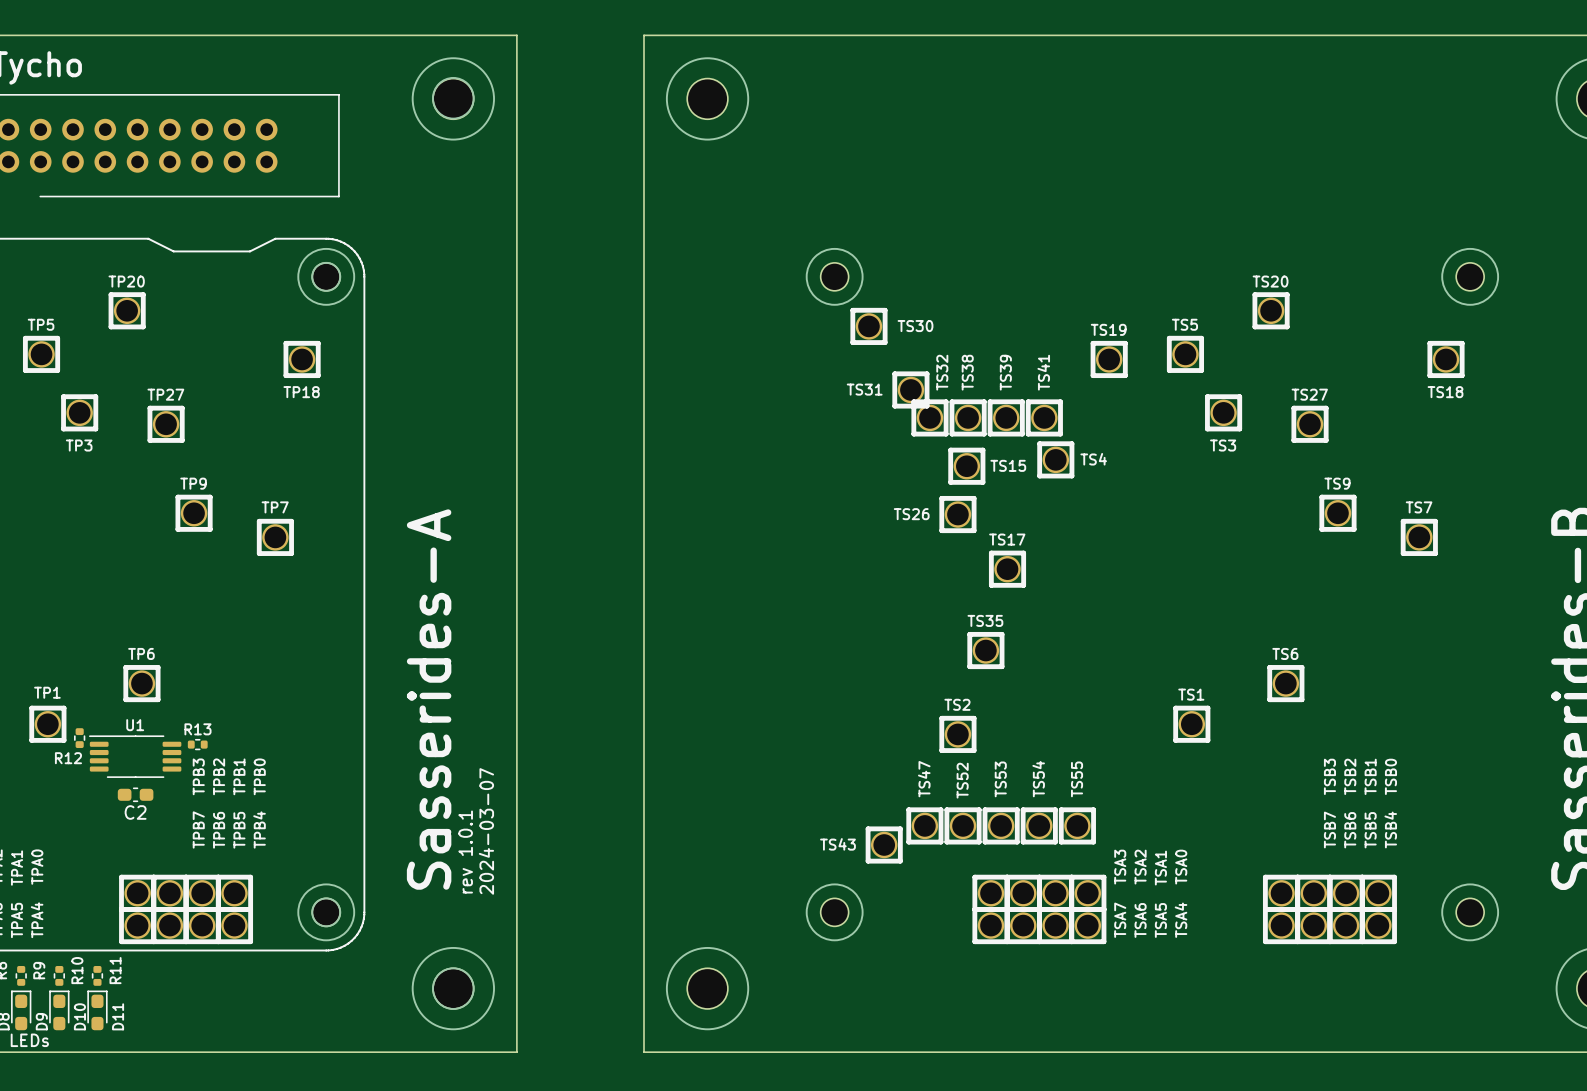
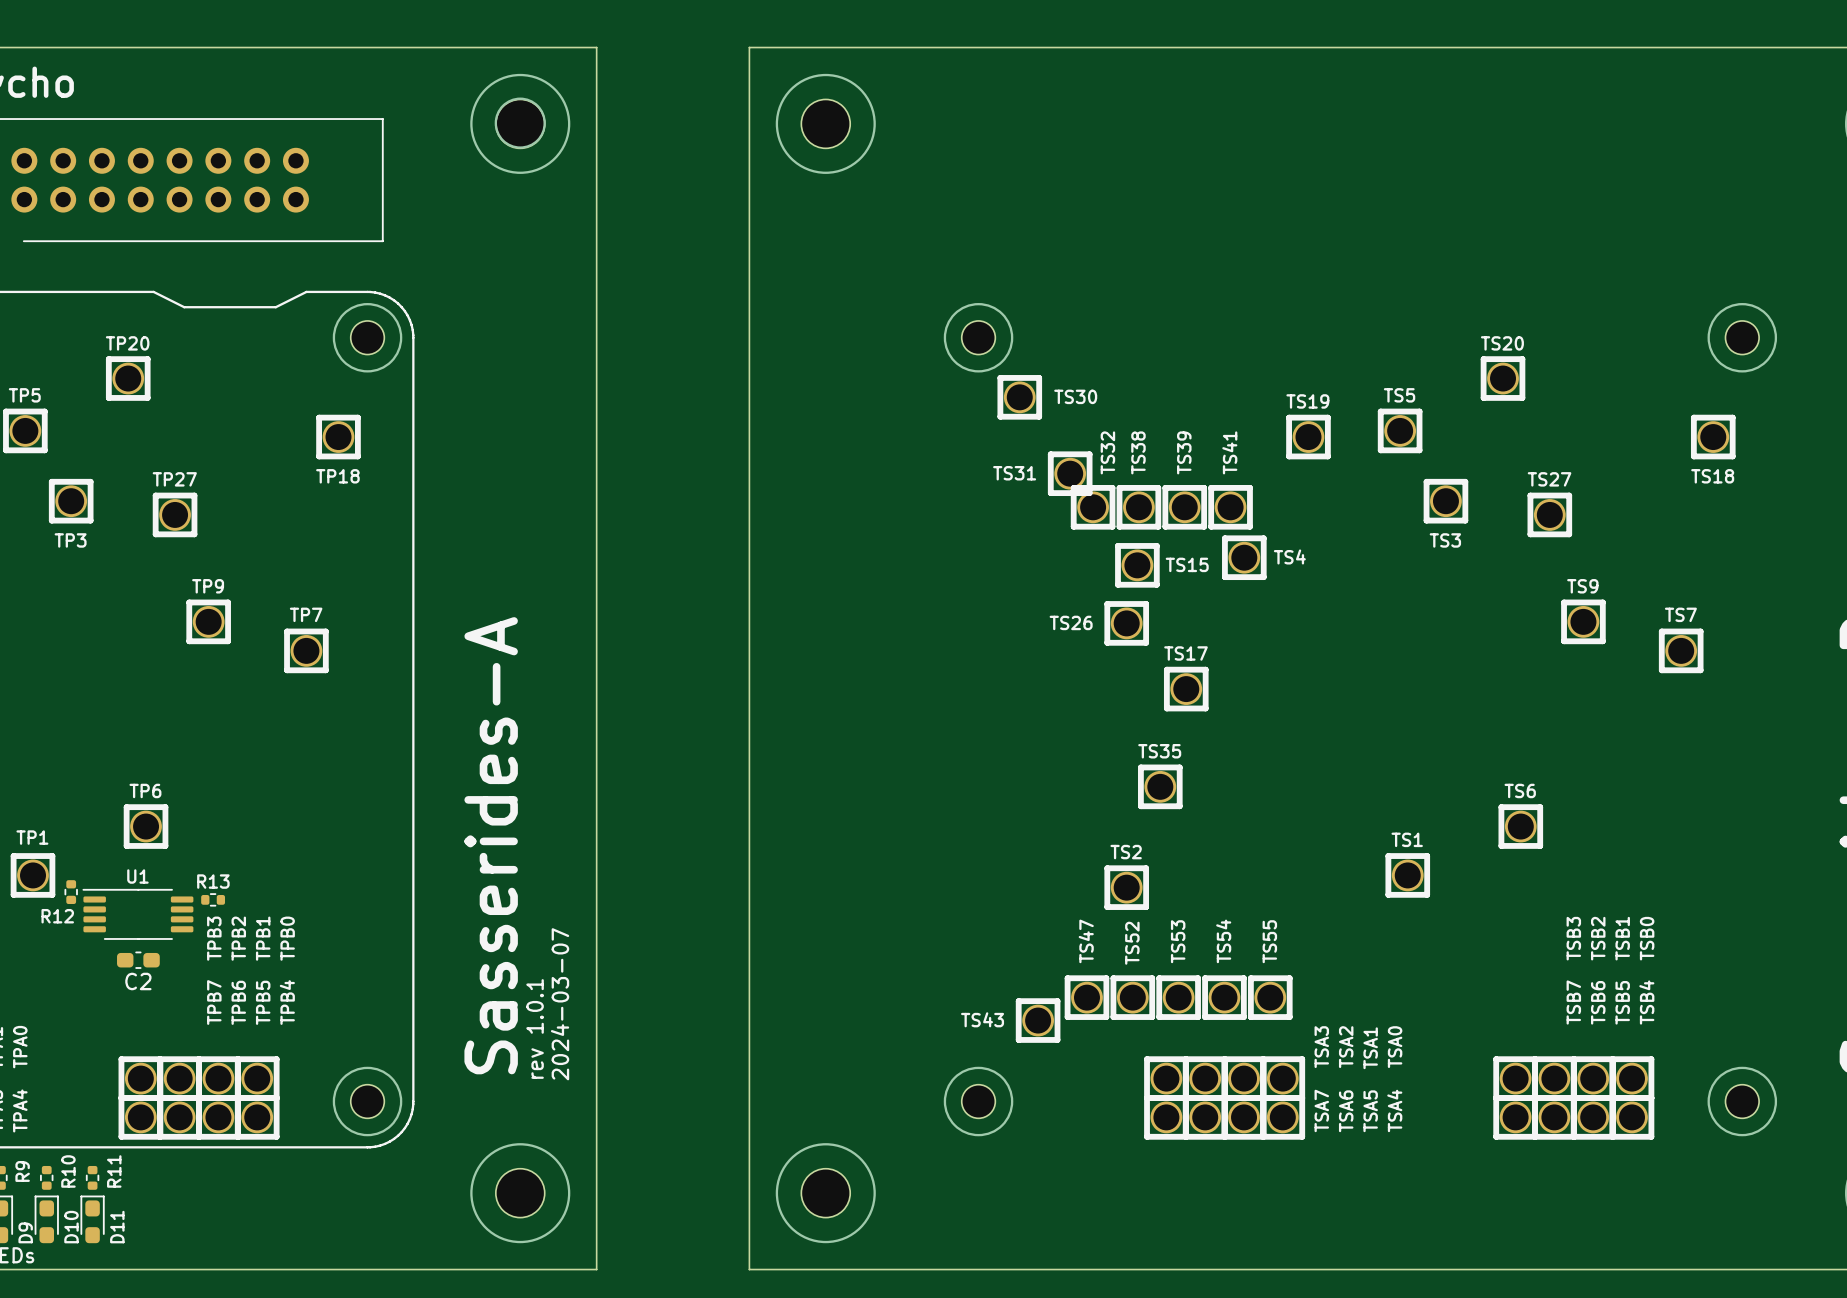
drawing: [311, 261, 342, 292] -> none
drawing: [311, 897, 342, 928] -> none
drawing: [432, 967, 475, 1010] -> none

